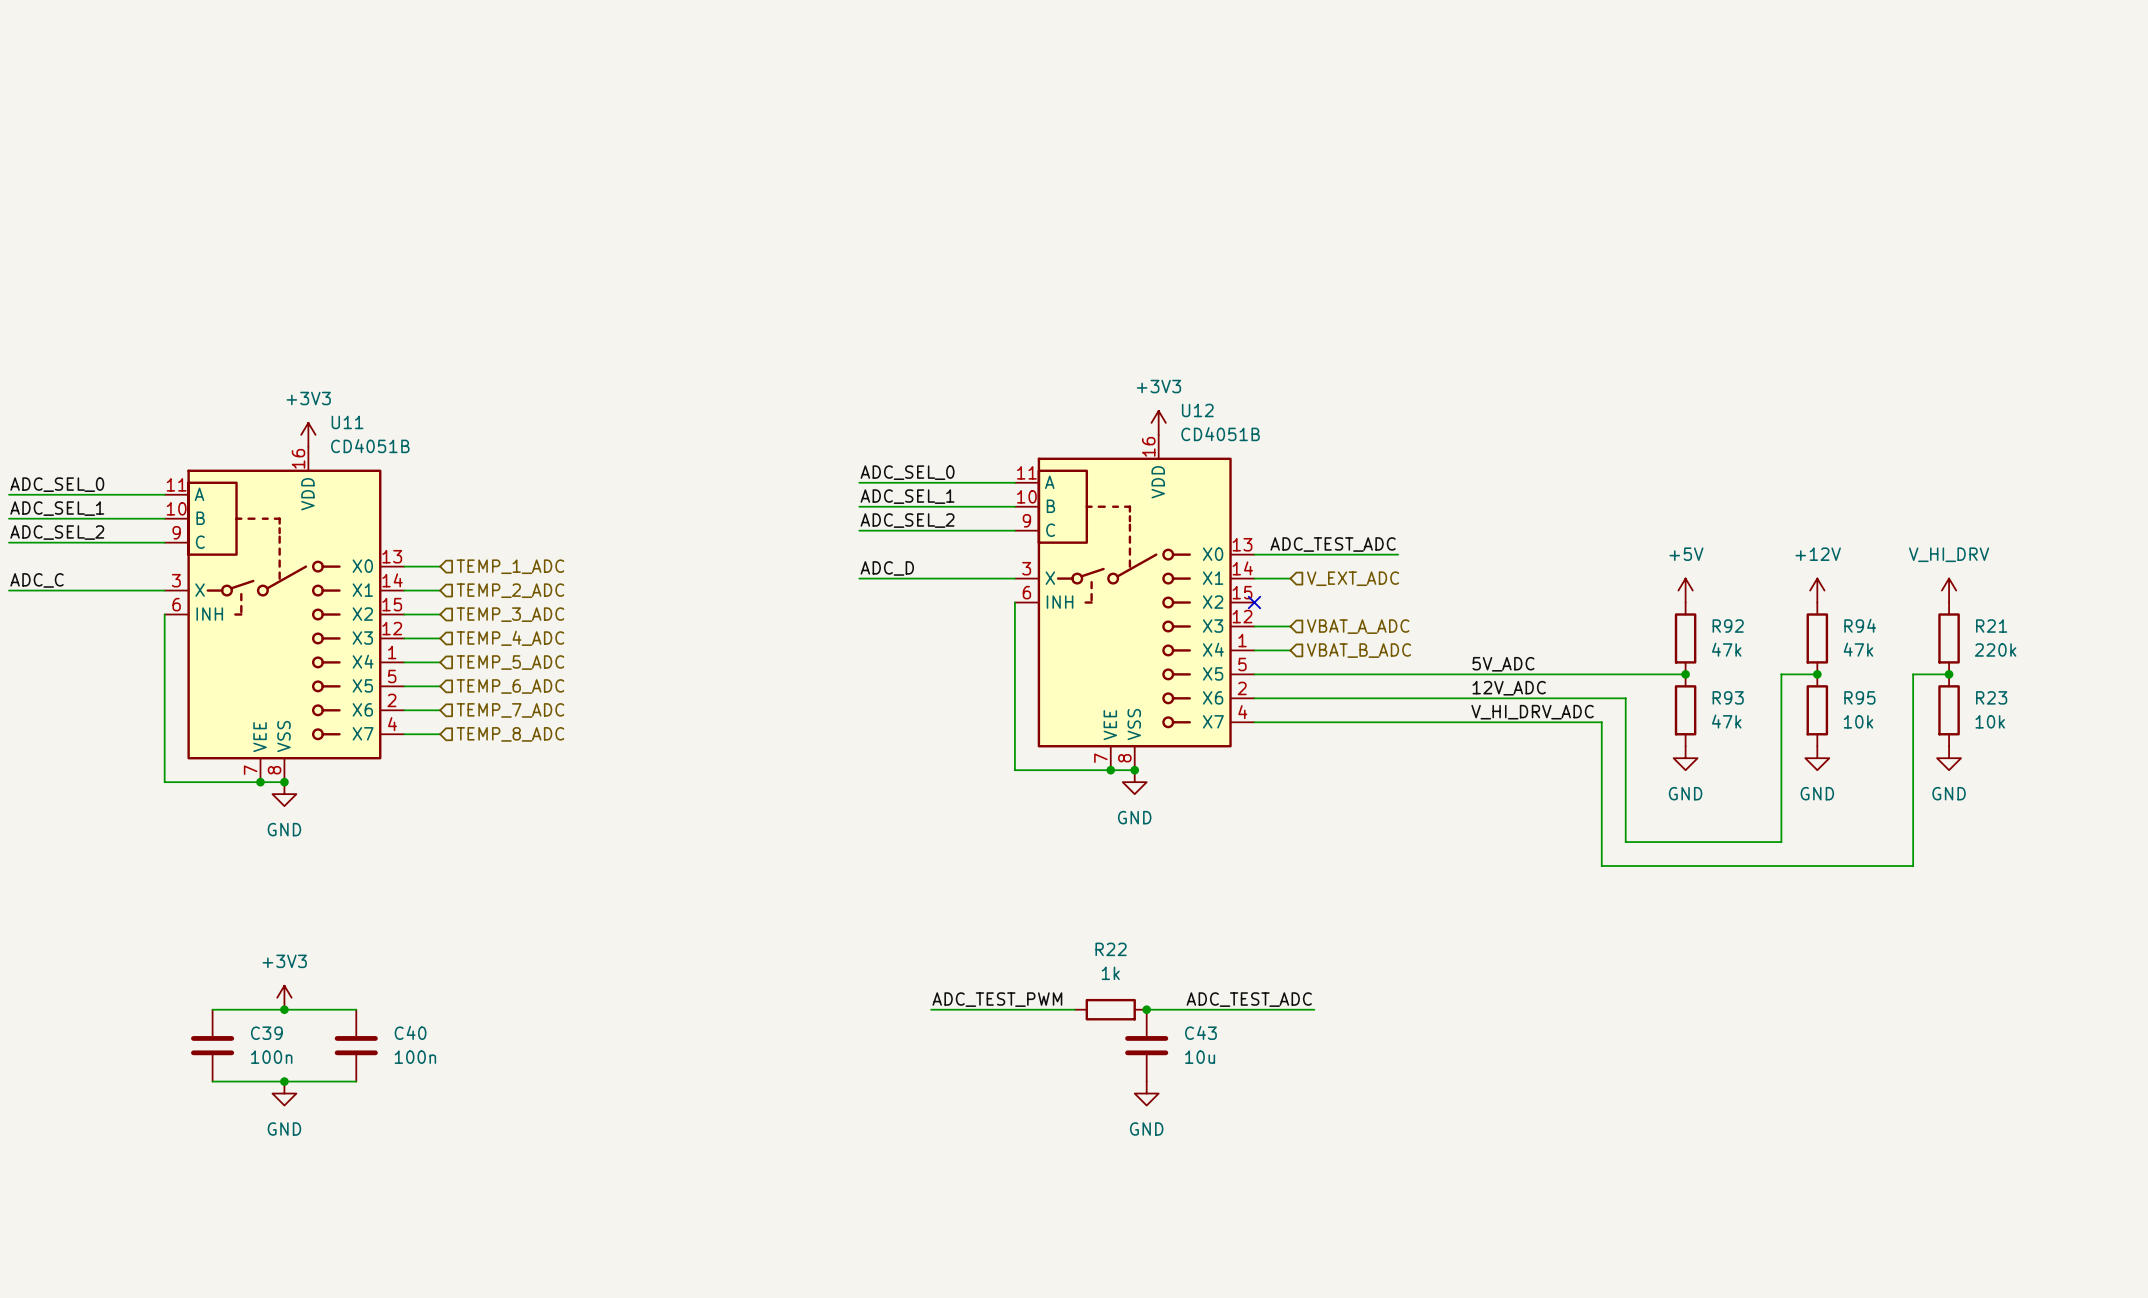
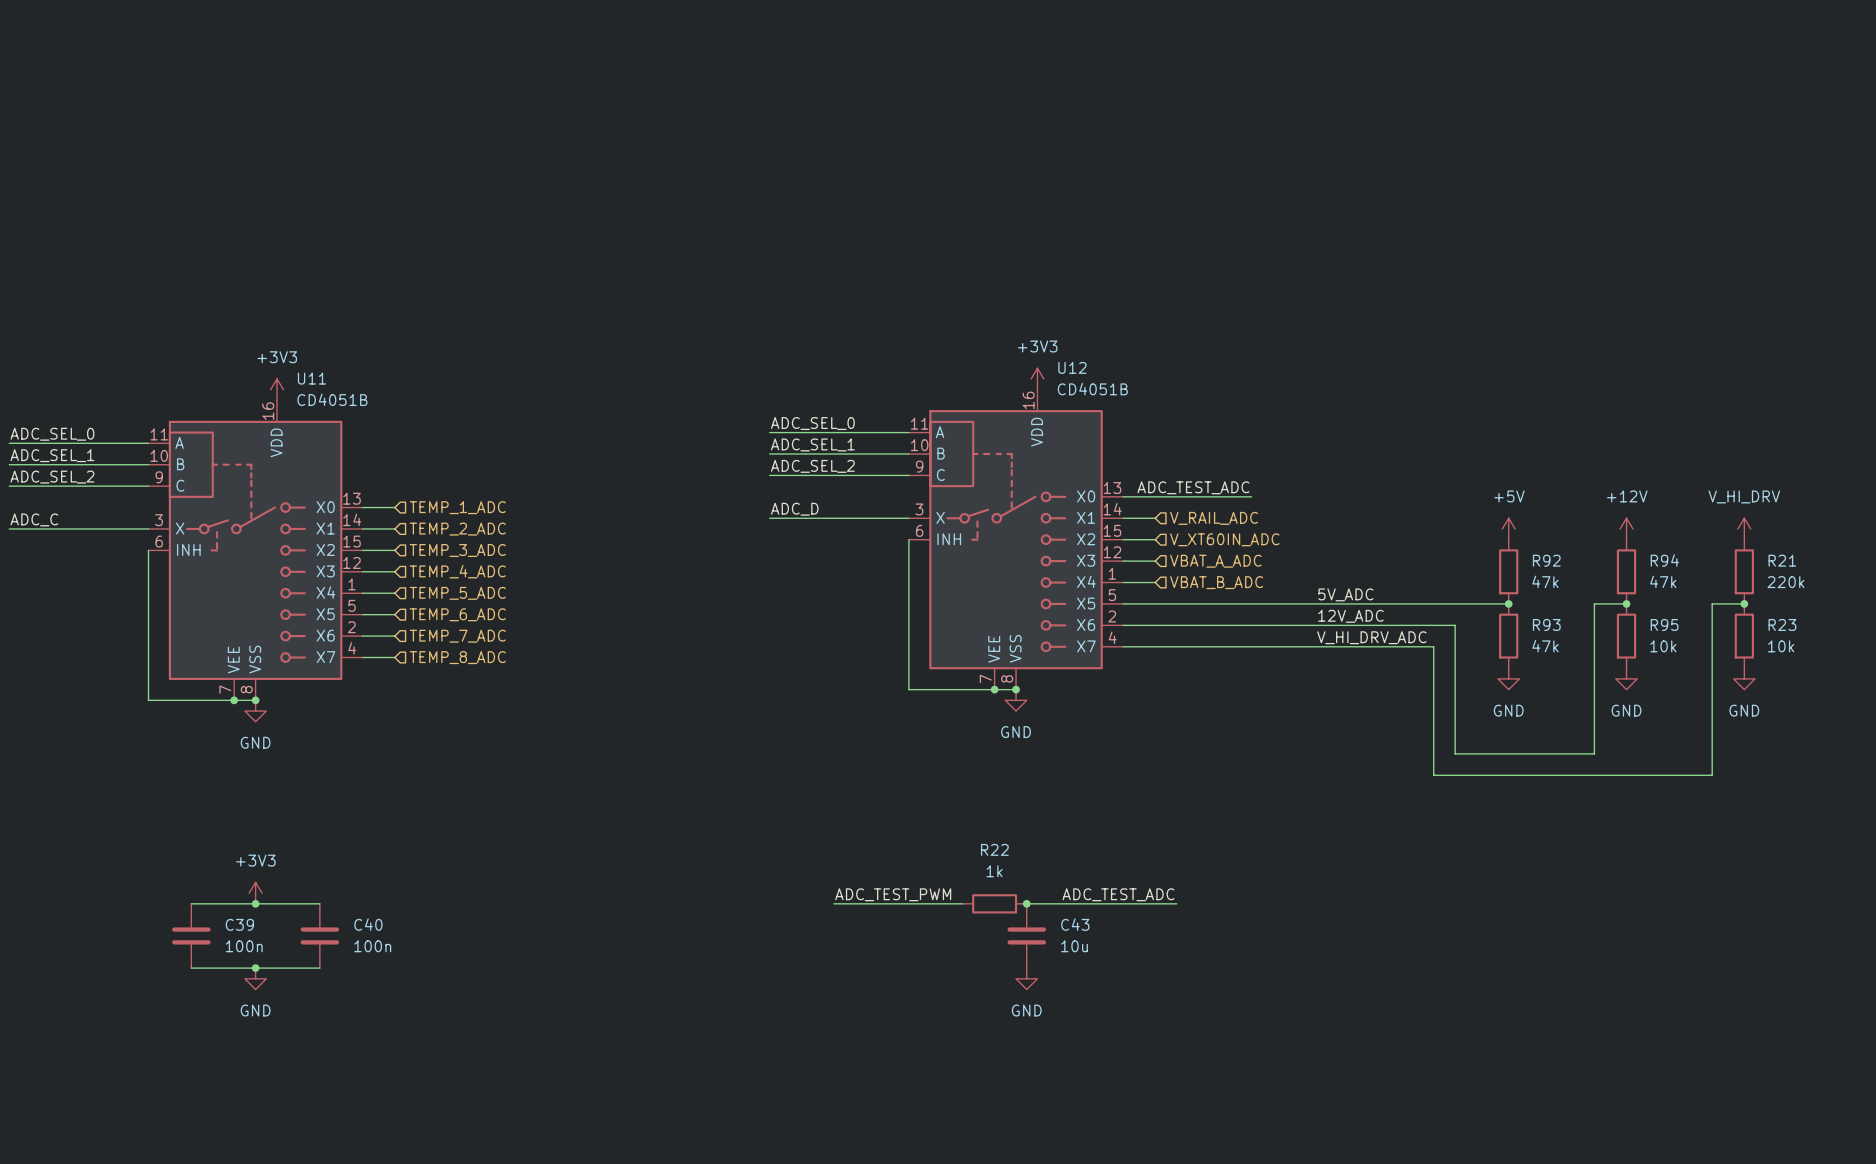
hierarchical label: V_EXT_ADC (1353, 578) -> V_RAIL_ADC (1214, 518)
wire: none -> (1123, 539) (1155, 539)
no-connect mark: (1254, 602) -> none
hierarchical label: none -> V_XT60IN_ADC (1224, 539)

